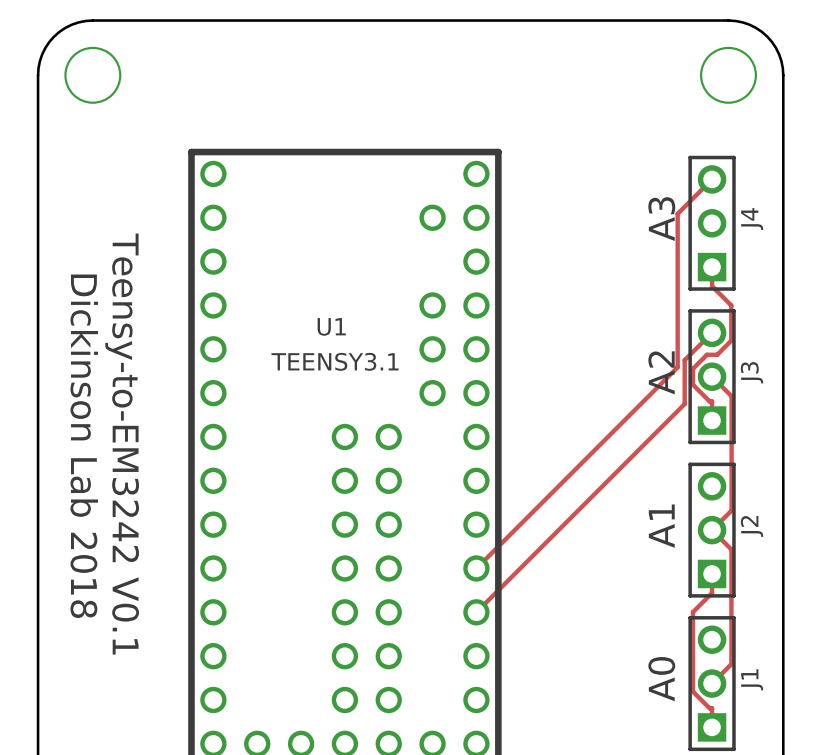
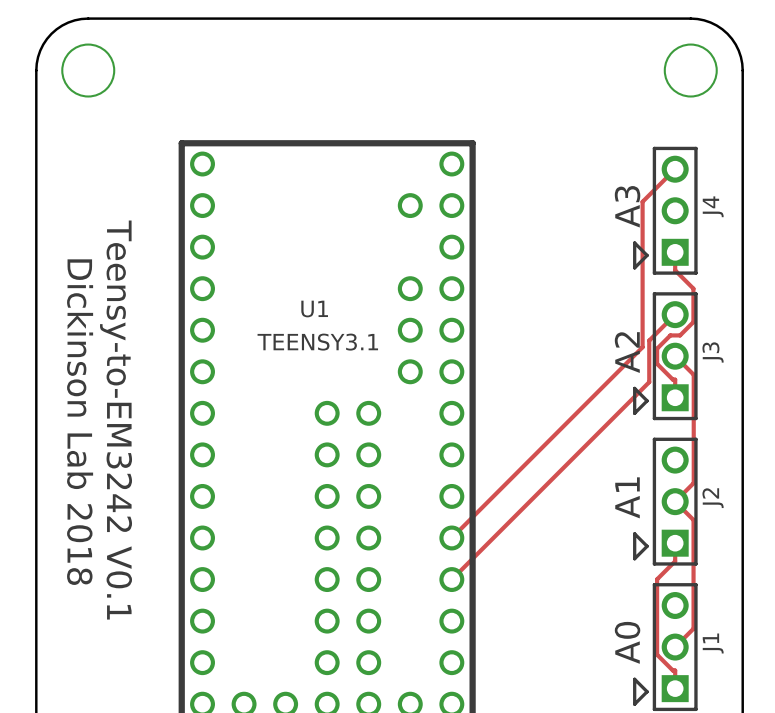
line: none -> (634, 242) (634, 267) (647, 255) (634, 242)
line: none -> (634, 388) (634, 413) (647, 400) (634, 388)
line: none -> (634, 533) (634, 558) (647, 546) (634, 533)
line: none -> (634, 679) (634, 704) (647, 691) (634, 679)

